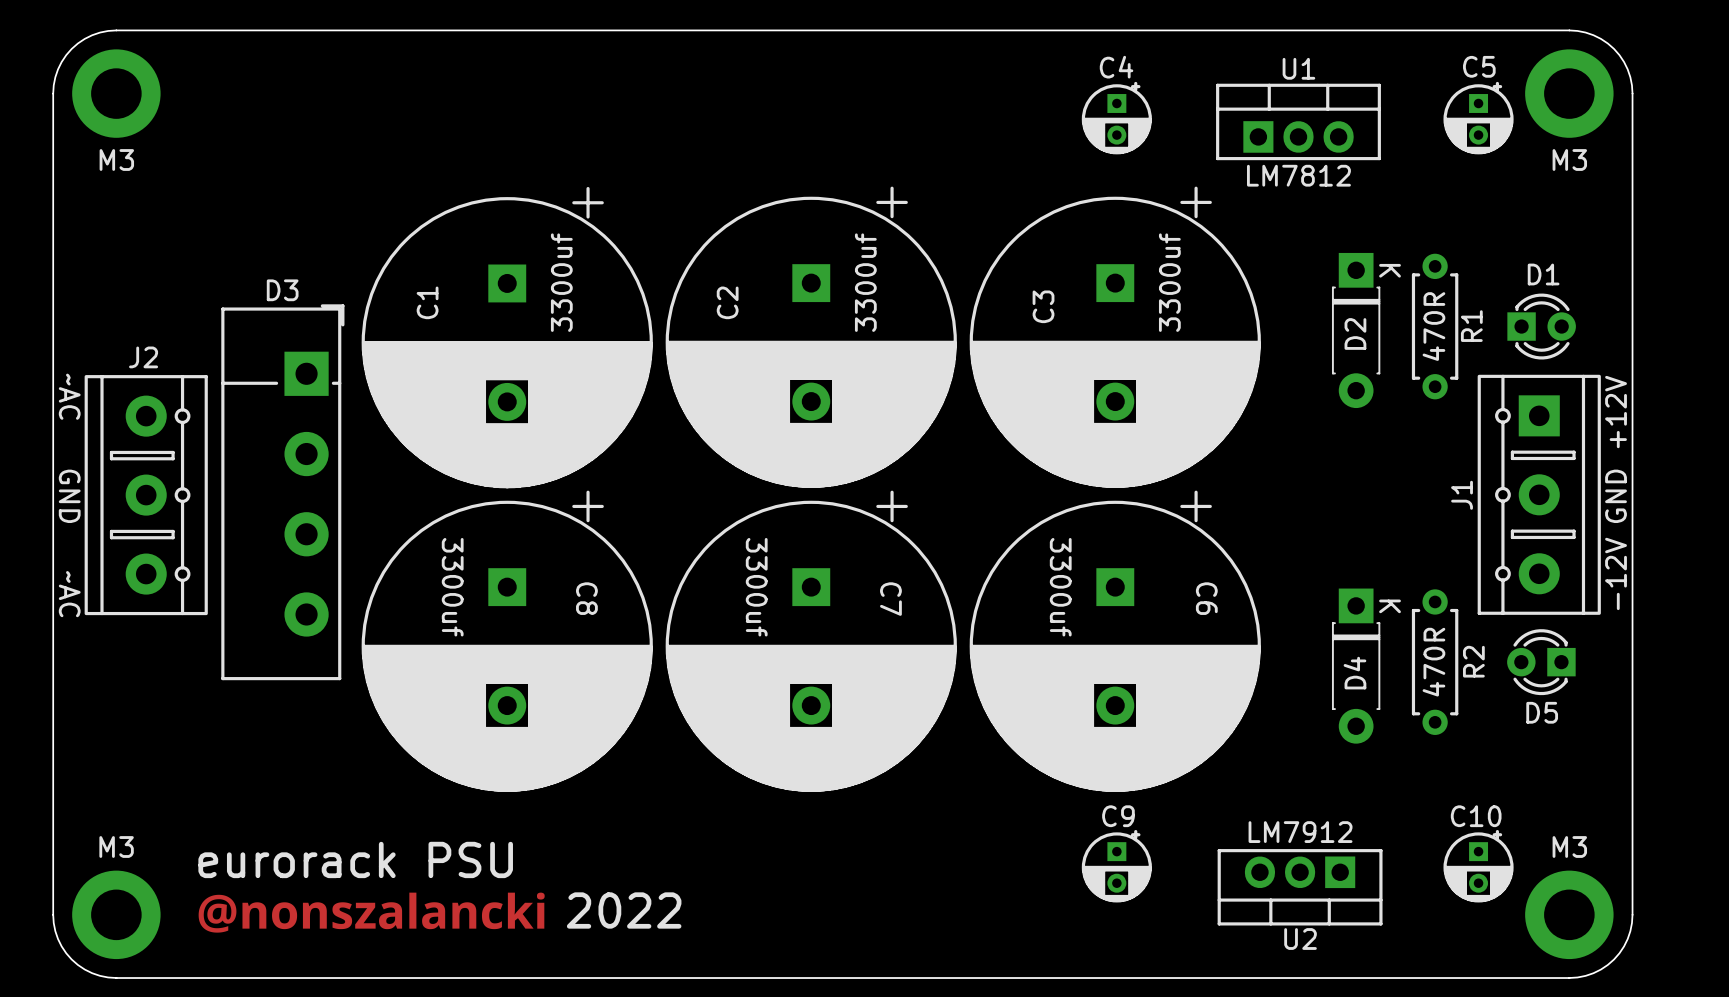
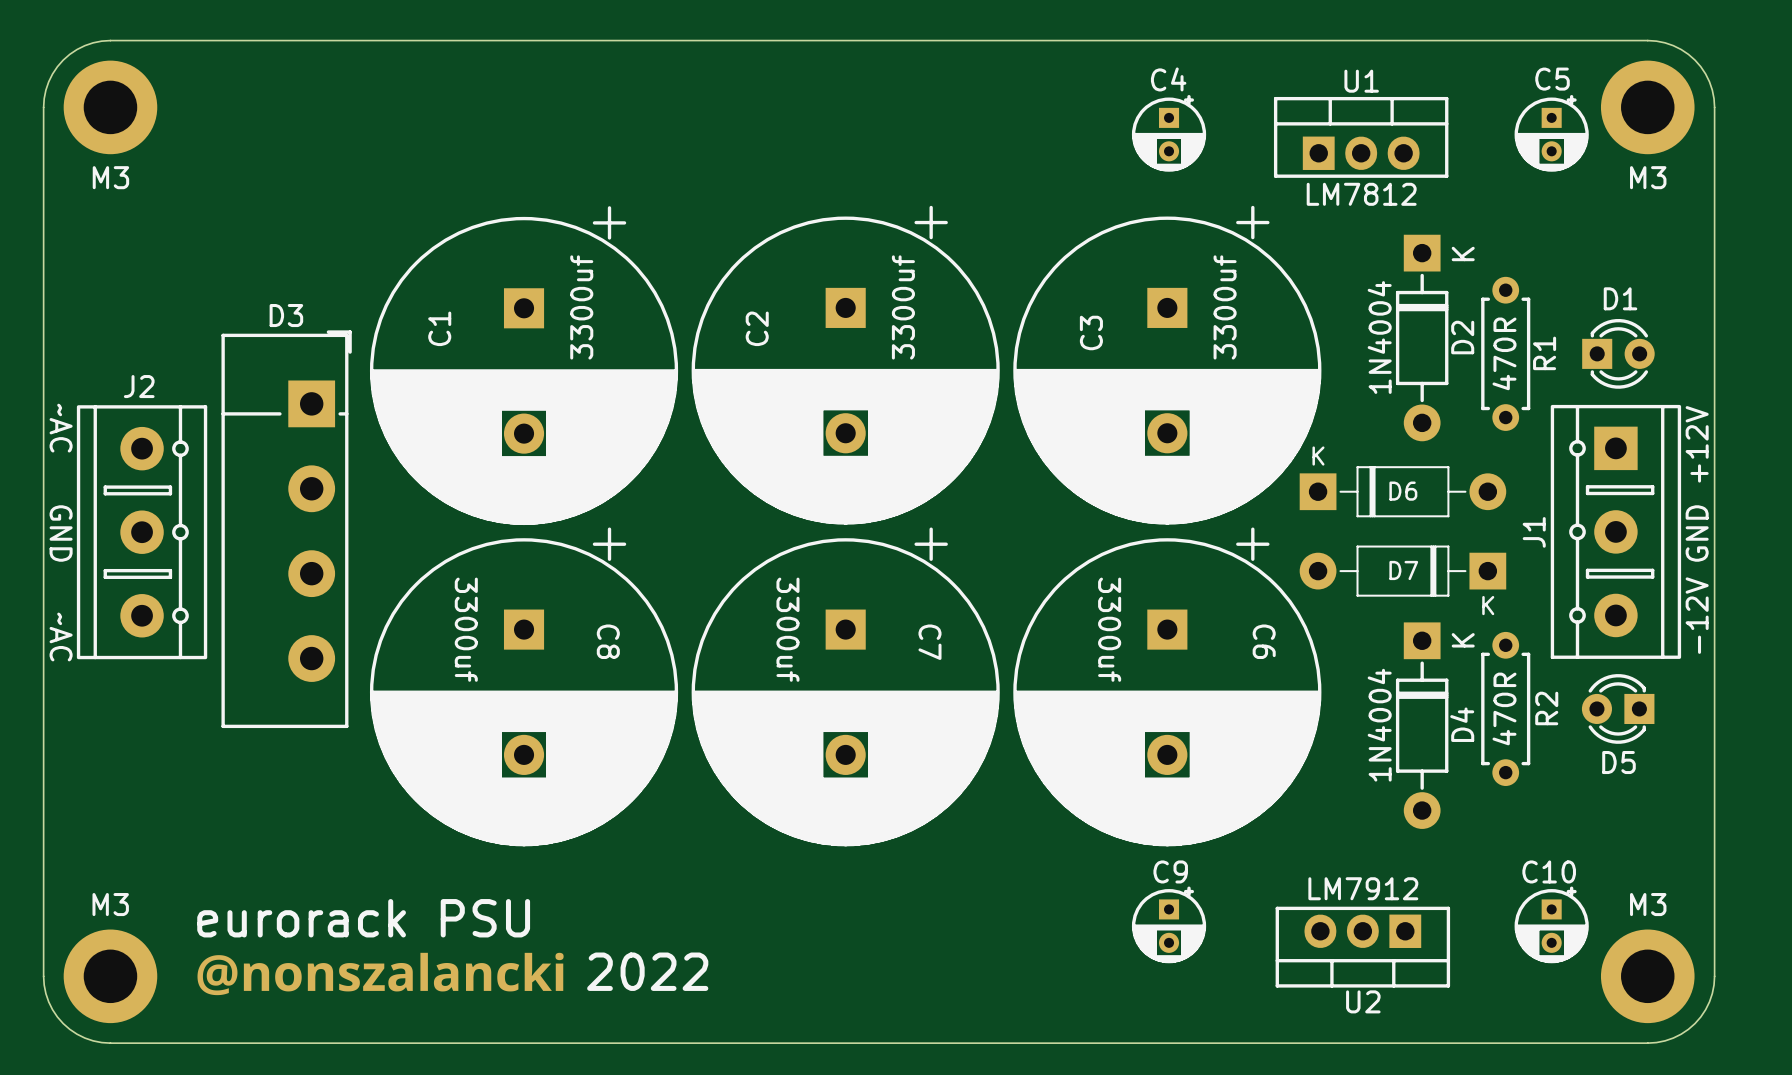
D2 footprint: [1331, 252, 1381, 409] -> [1395, 234, 1449, 442]
D2 value: none -> 1N4004 (1379, 337)
D2 name position: D2 (1355, 333) -> D2 (1462, 337)
D6: none -> (1402, 491)
D7: none -> (1402, 571)
D4 footprint: [1331, 588, 1381, 744] -> [1395, 622, 1449, 829]
D4 name position: D4 (1354, 673) -> D4 (1462, 724)
D4 value: none -> 1N4004 (1379, 725)

